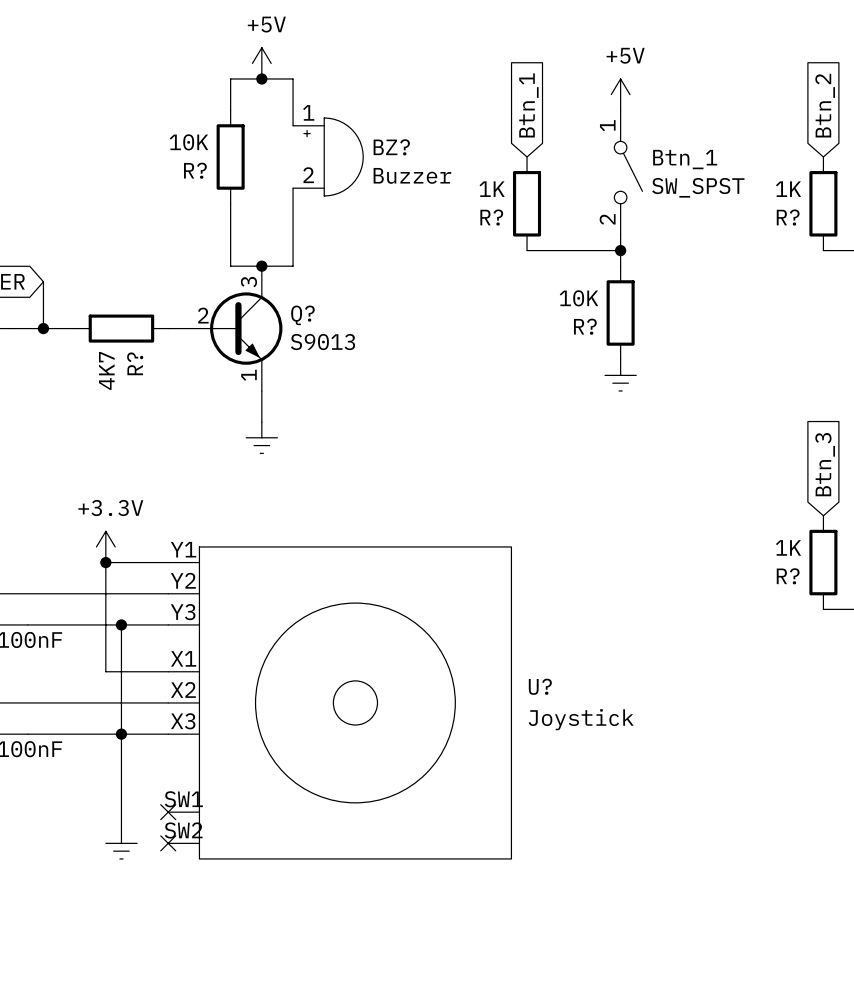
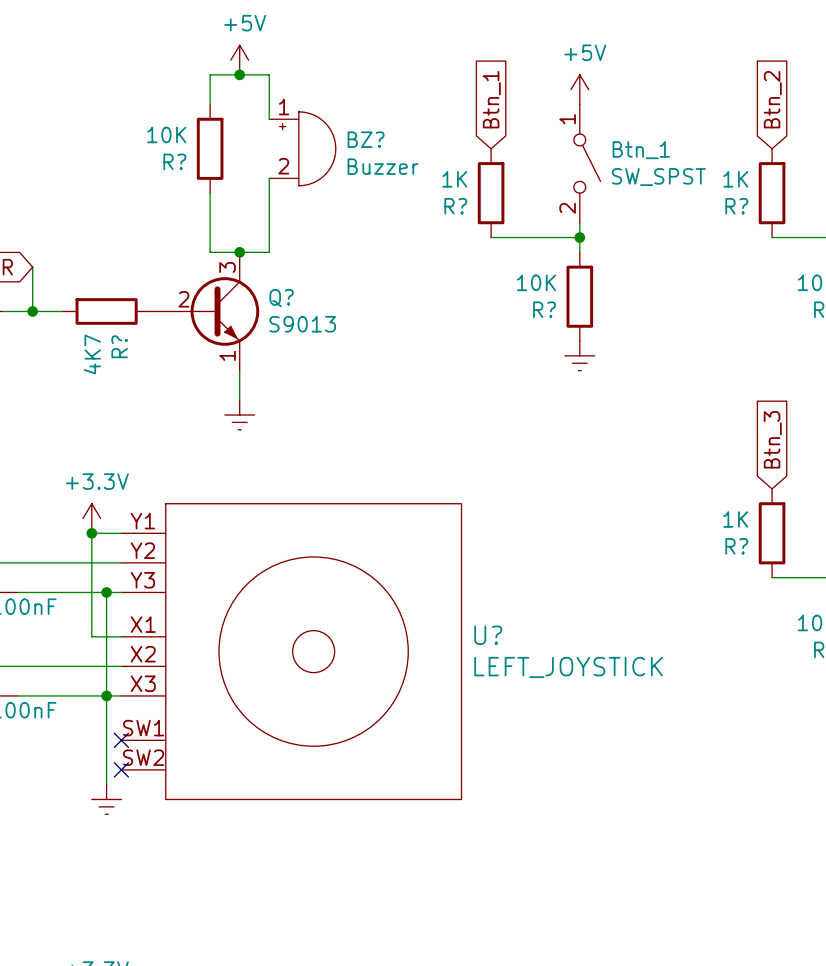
U?: none -> LEFT_JOYSTICK (291, 651)
U?: Joystick (339, 702) -> none
no-connect mark: none -> (121, 740)
no-connect mark: none -> (121, 769)
no-connect mark: (168, 812) -> none
no-connect mark: (168, 843) -> none

